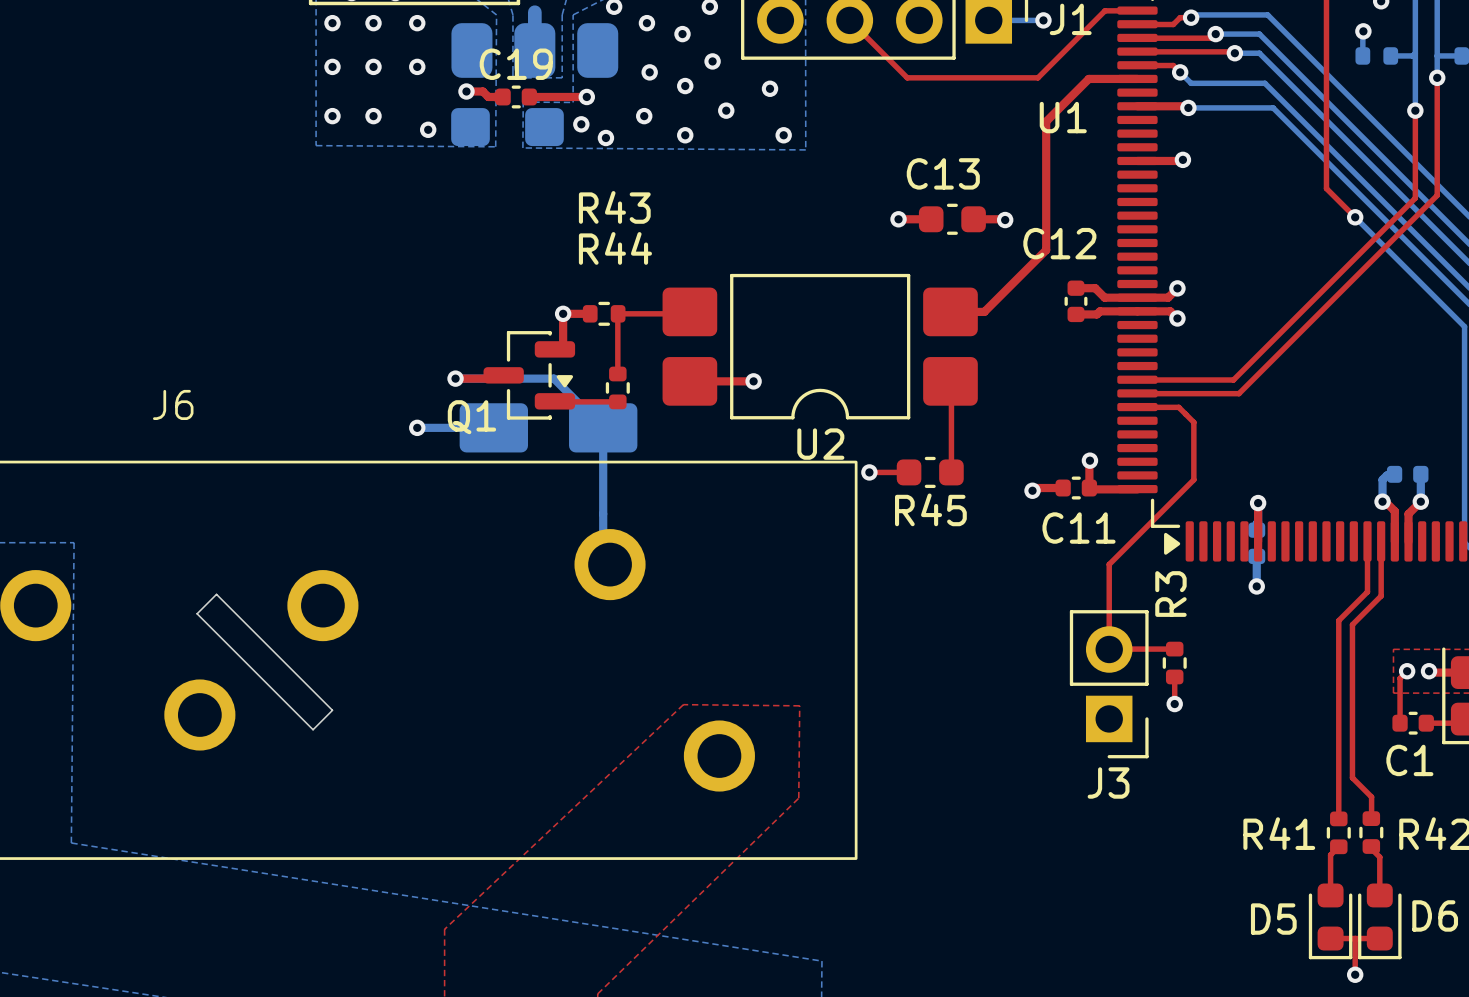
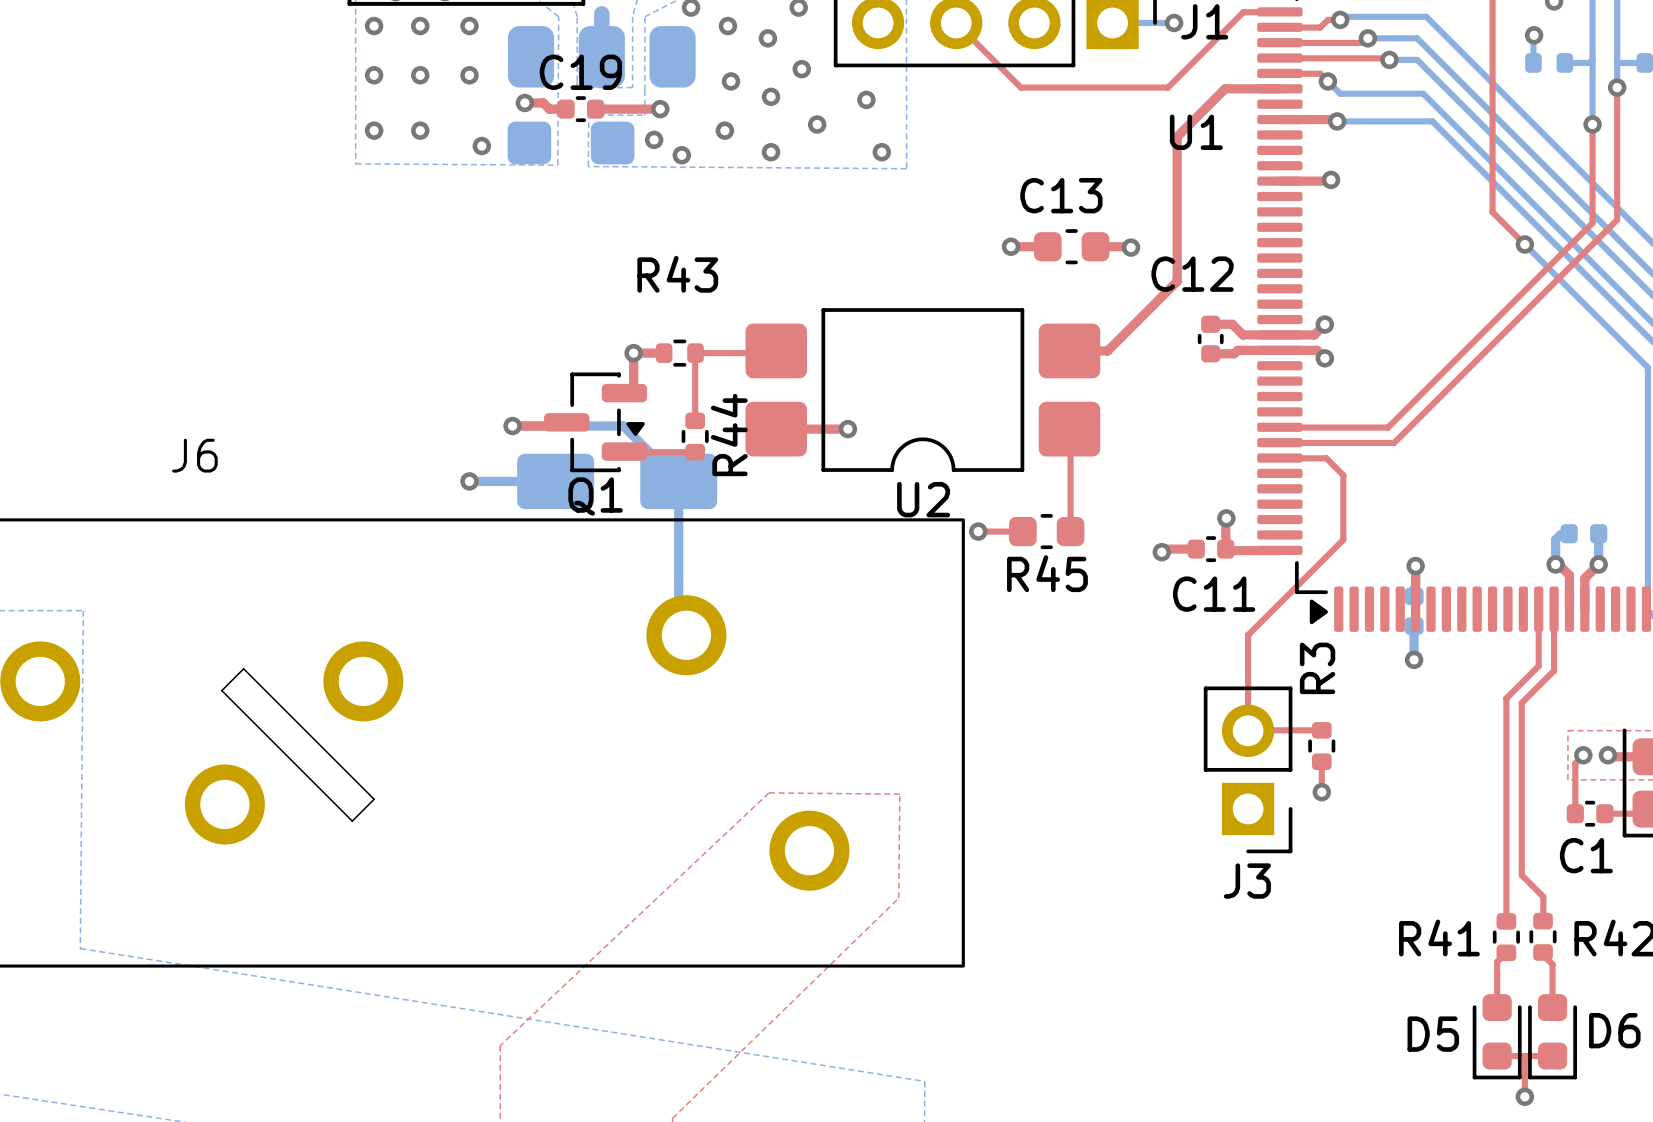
R43 name position: R43 (614, 207) -> R43 (677, 274)
R44 name rotation: 0° (615, 248) -> 90° counterclockwise (729, 435)
R44 name position: R44 (615, 248) -> R44 (729, 435)
Q1 name position: Q1 (471, 417) -> Q1 (595, 496)

